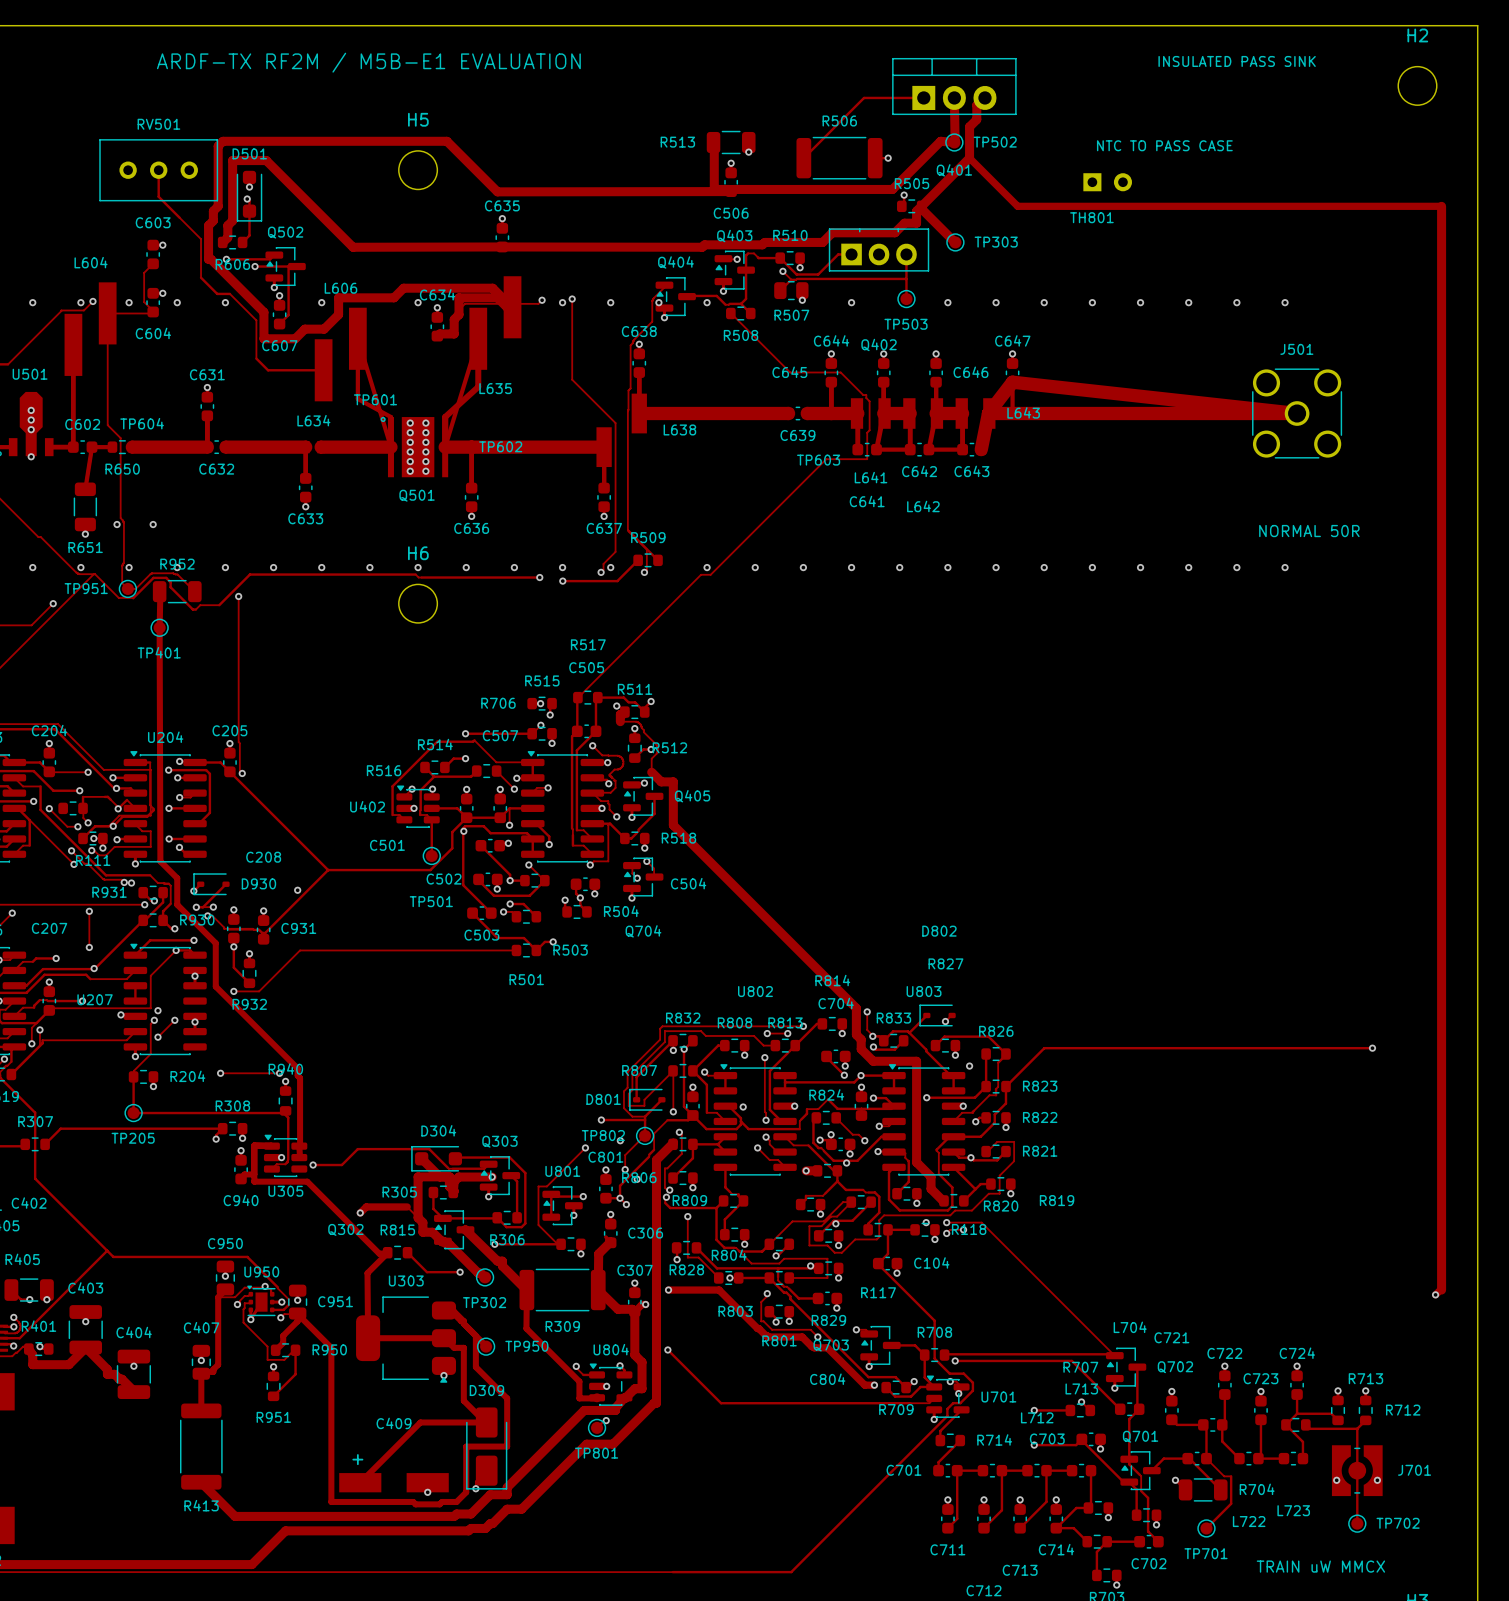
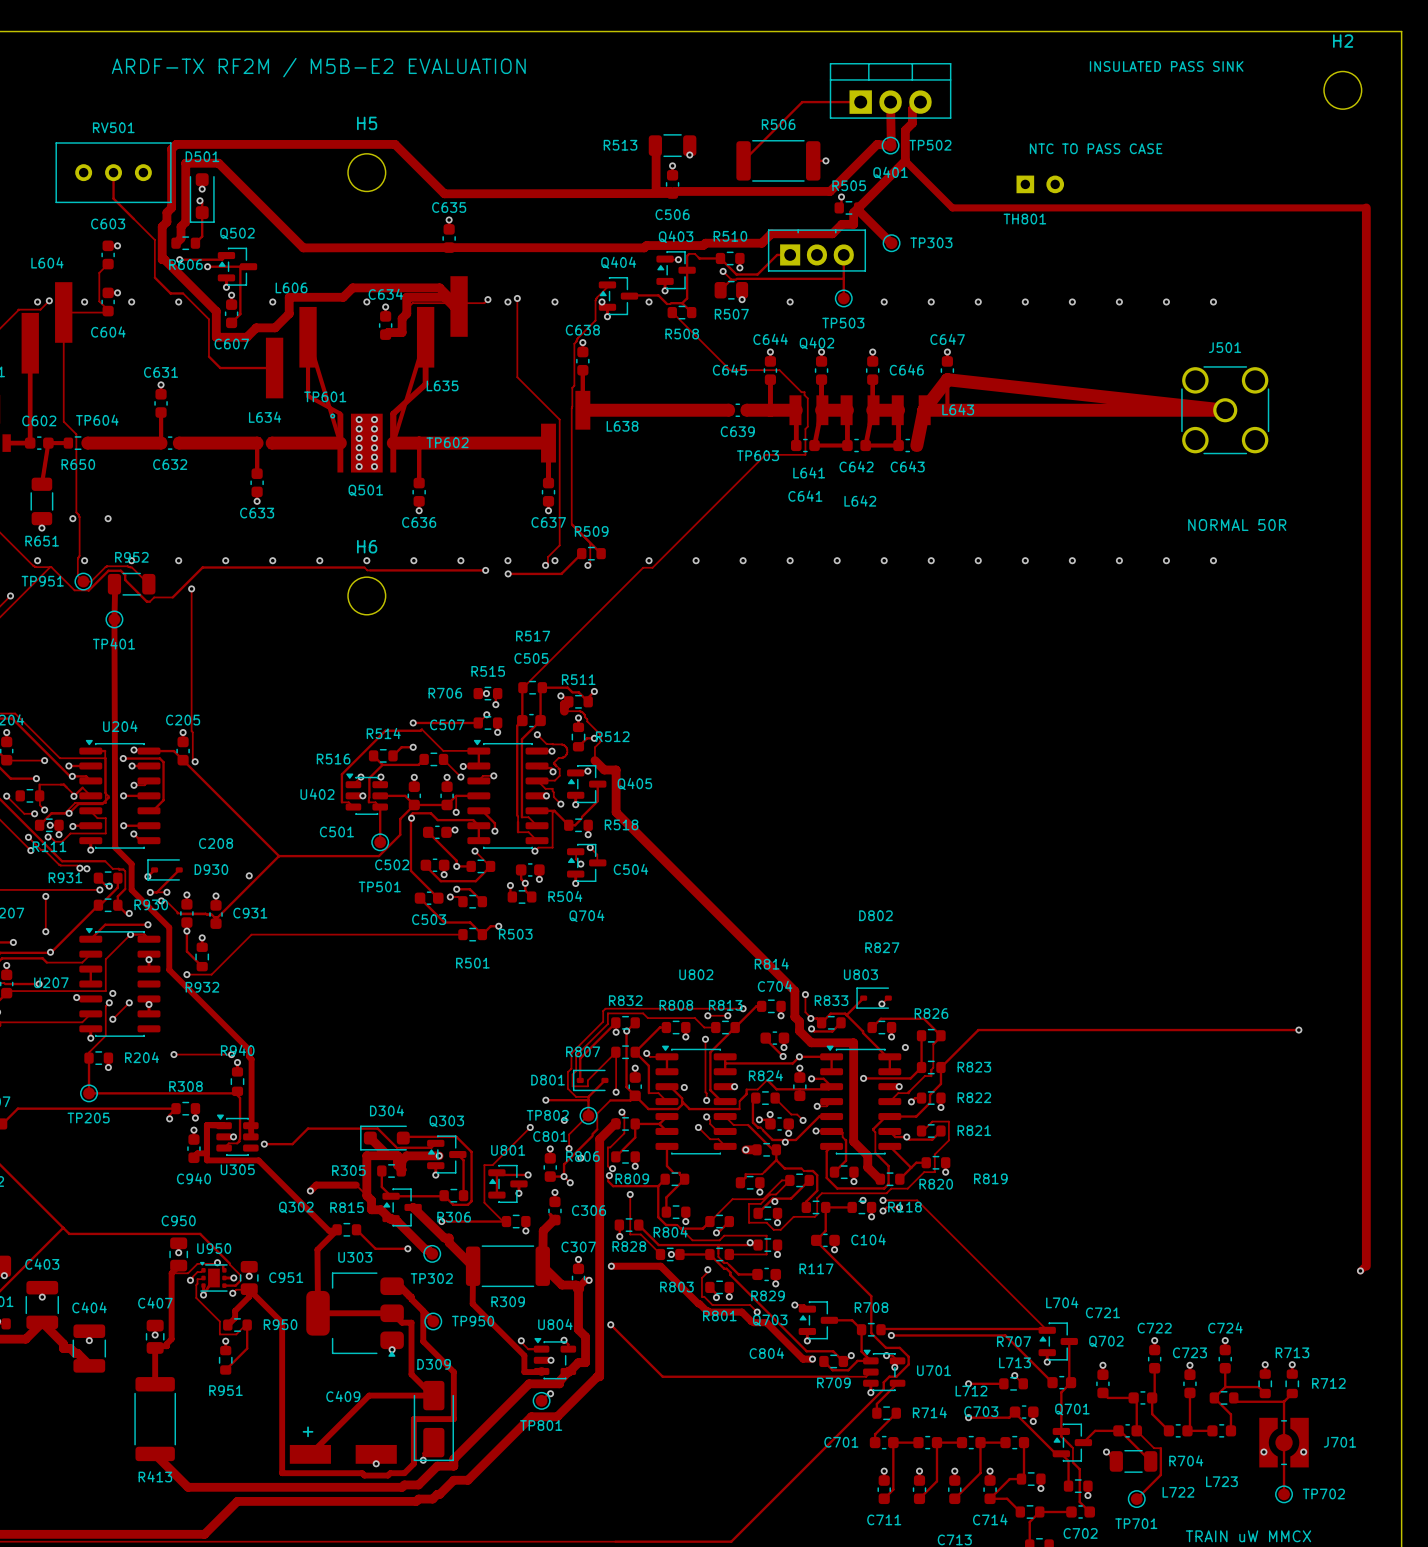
text: ARDF-TX RF2M / M5B-E1 EVALUATION (368, 62) -> ARDF-TX RF2M / M5B-E2 EVALUATION (318, 67)

